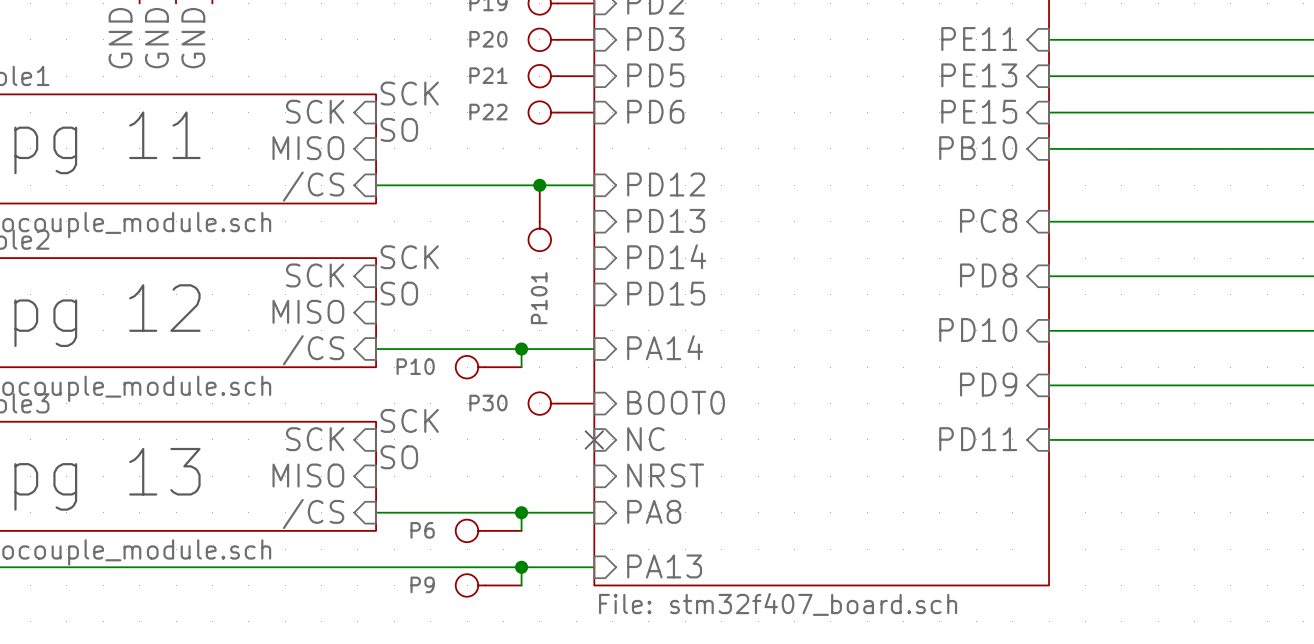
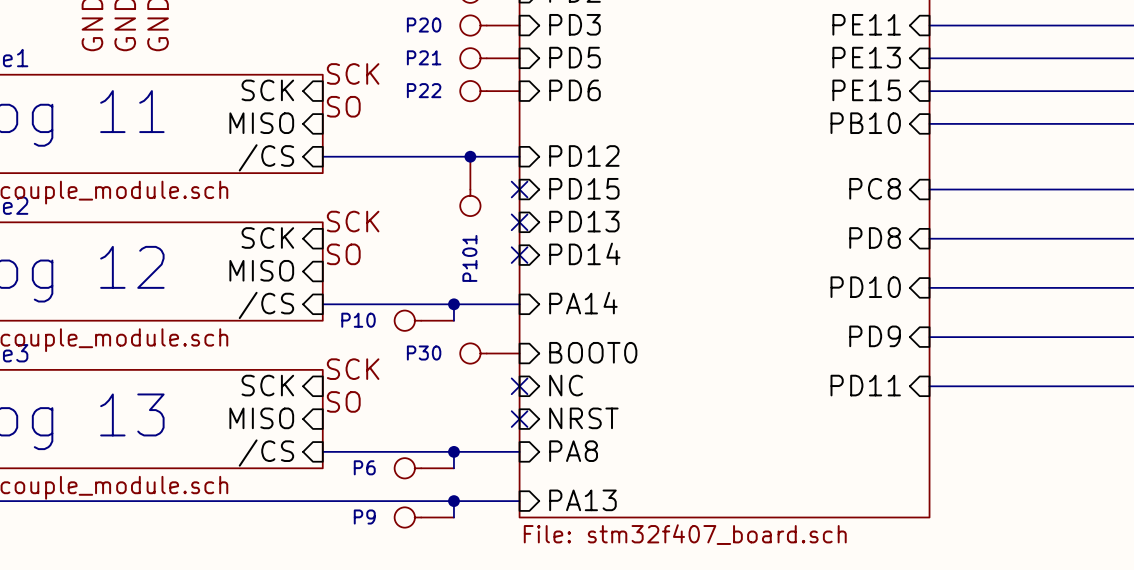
sheet pin: PD13 (666, 220) -> PD15 (584, 188)
no-connect mark: none -> (519, 189)
sheet pin: PD14 (666, 256) -> PD13 (584, 221)
no-connect mark: none -> (519, 222)
sheet pin: PD15 (666, 293) -> PD14 (584, 253)
no-connect mark: none -> (519, 255)
no-connect mark: none -> (519, 419)

